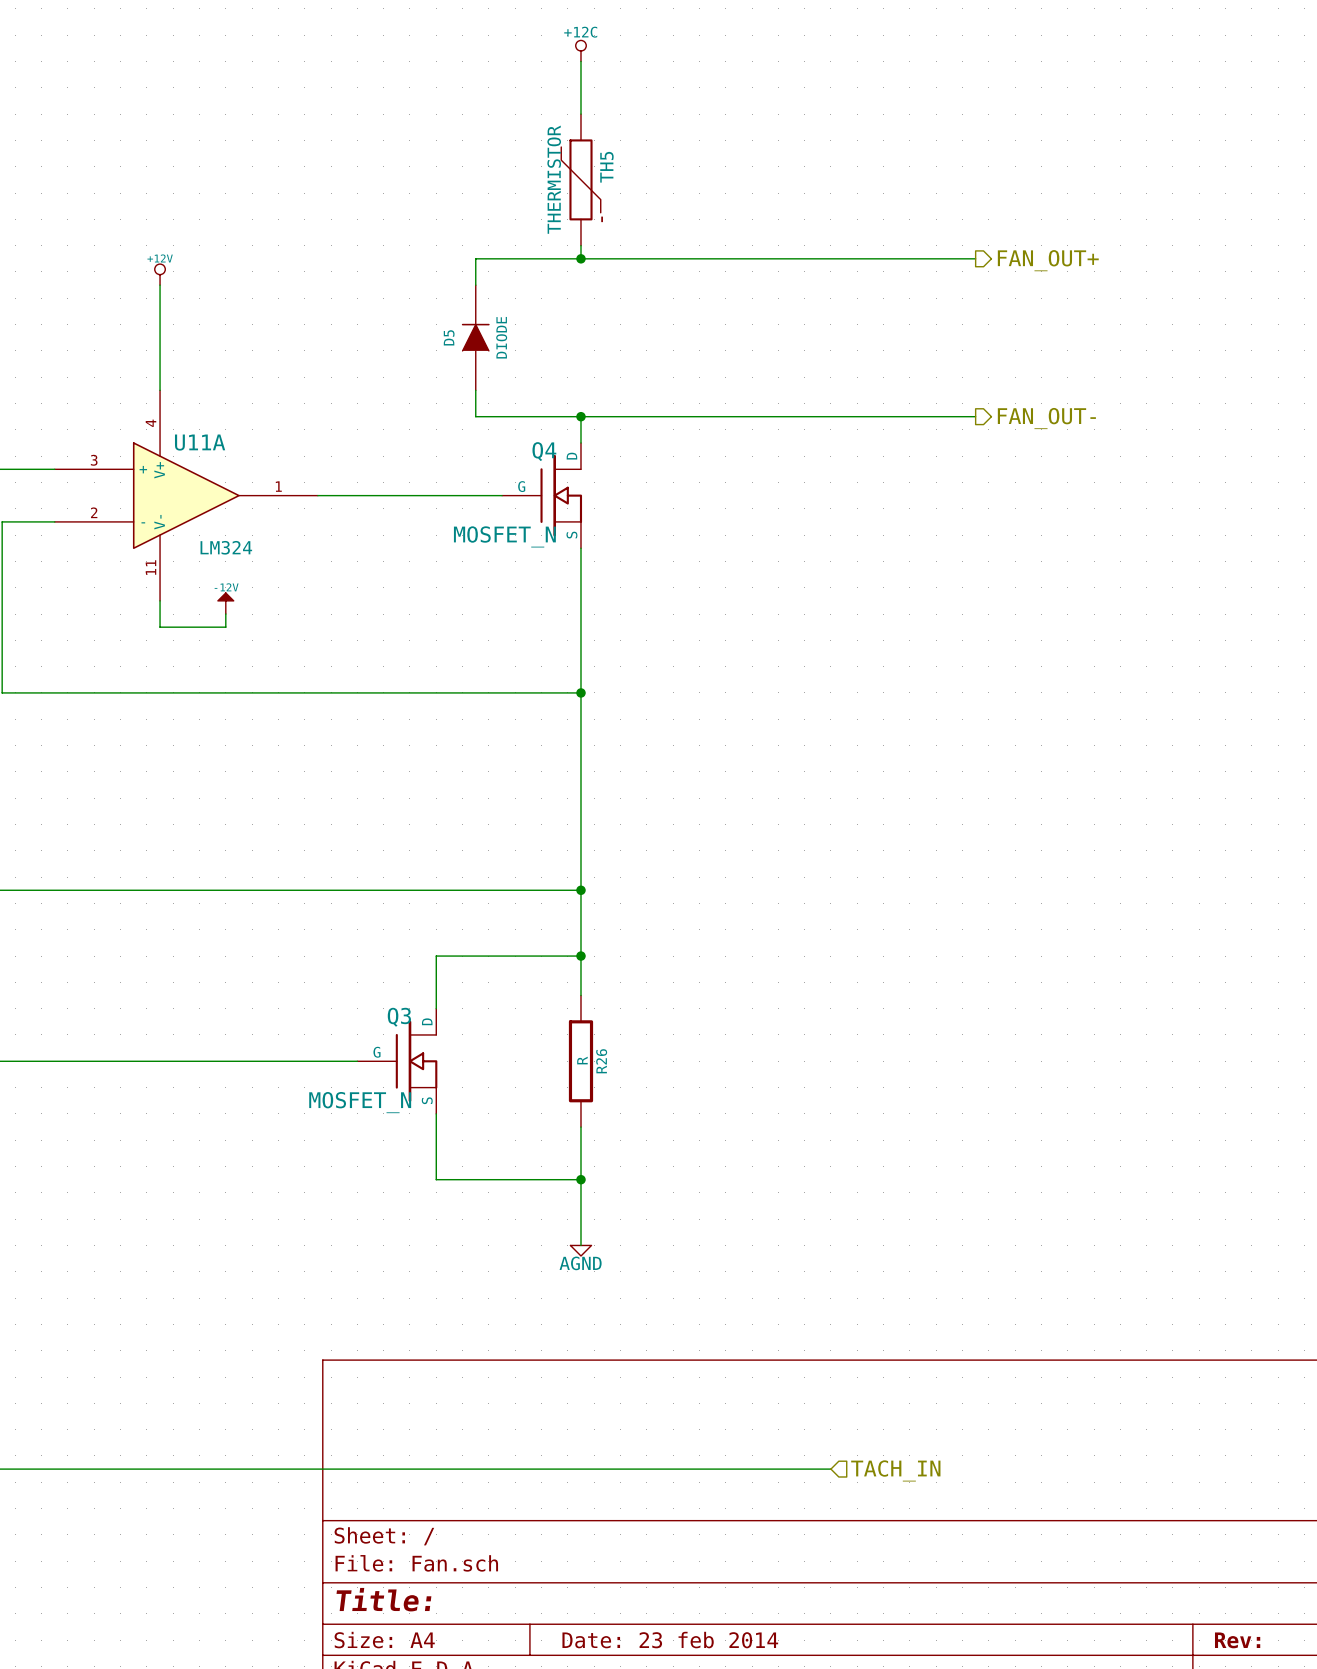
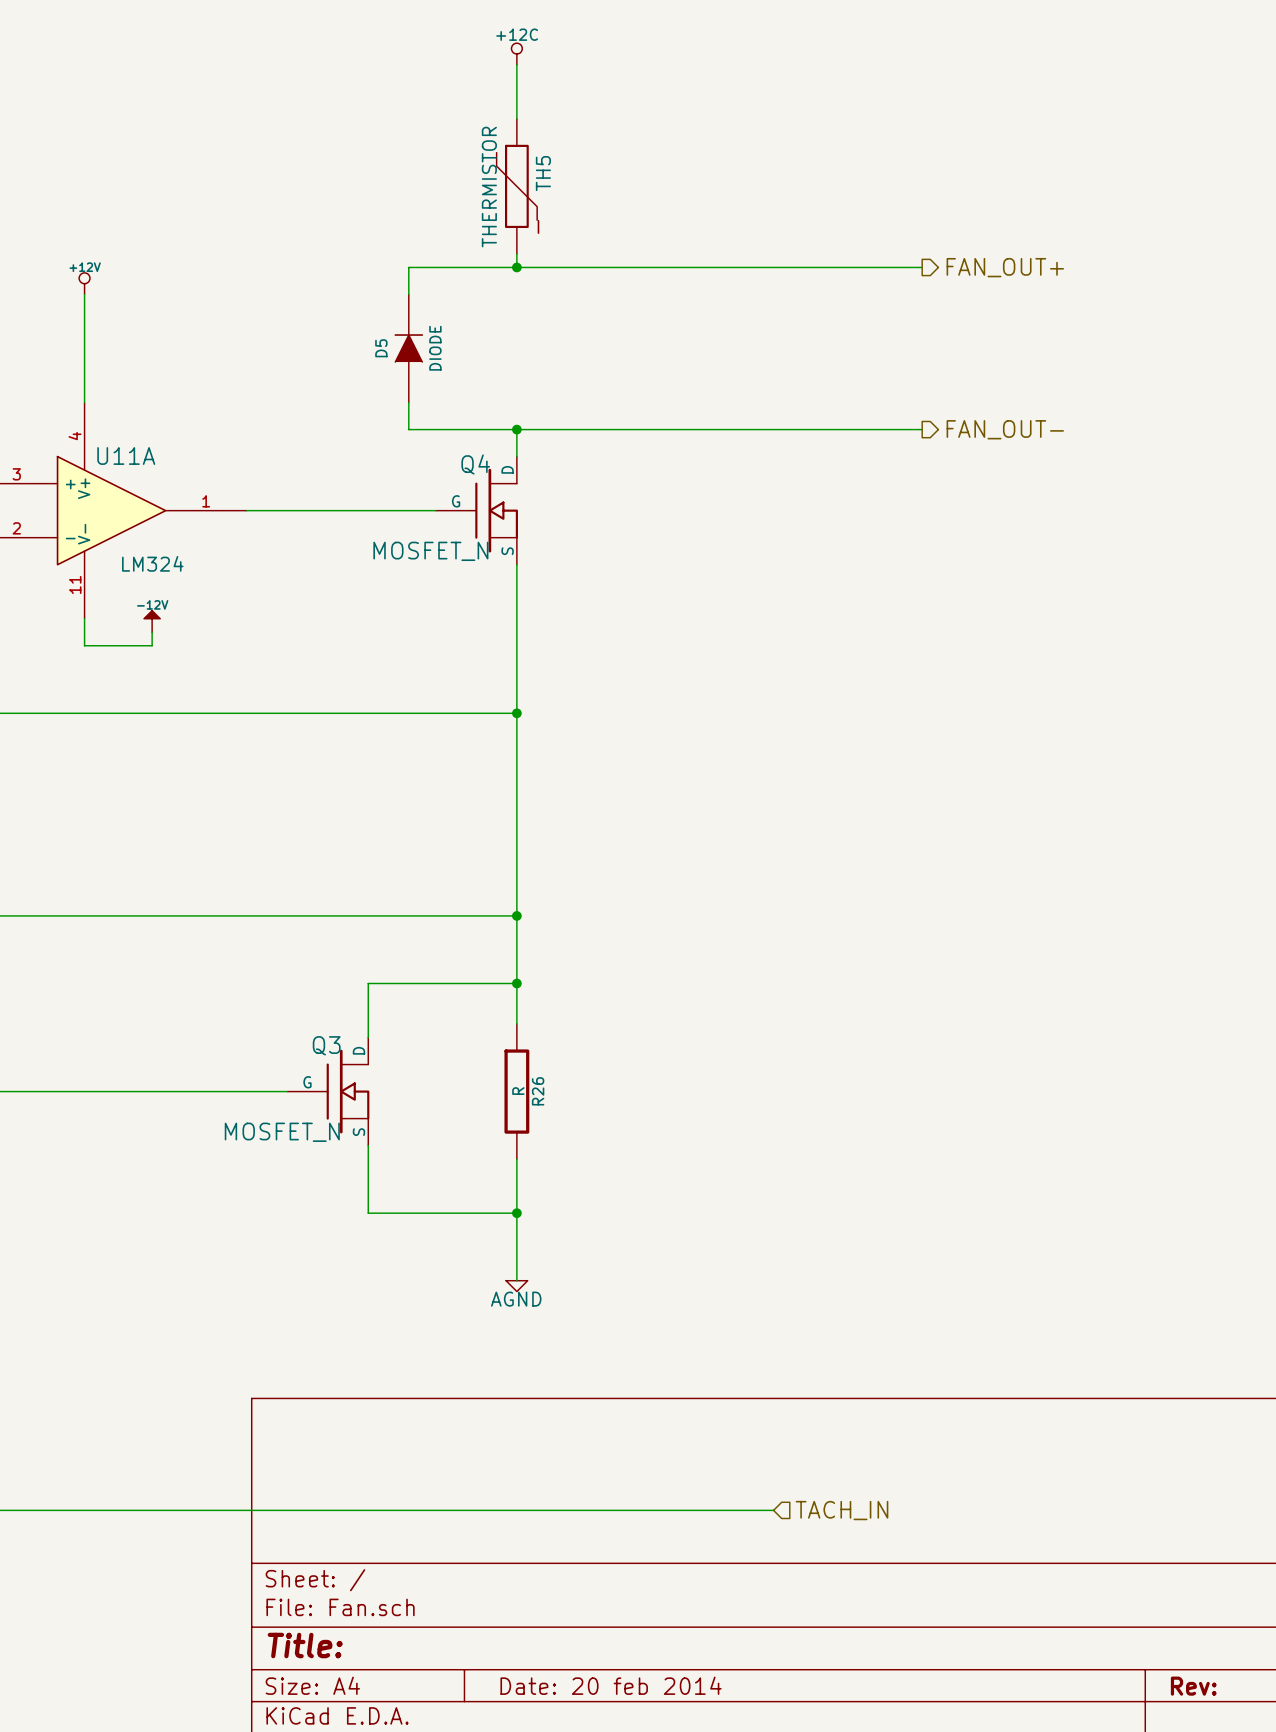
title block: Date: 23 feb 2014 (670, 1640) -> Date: 20 feb 2014 (611, 1685)

